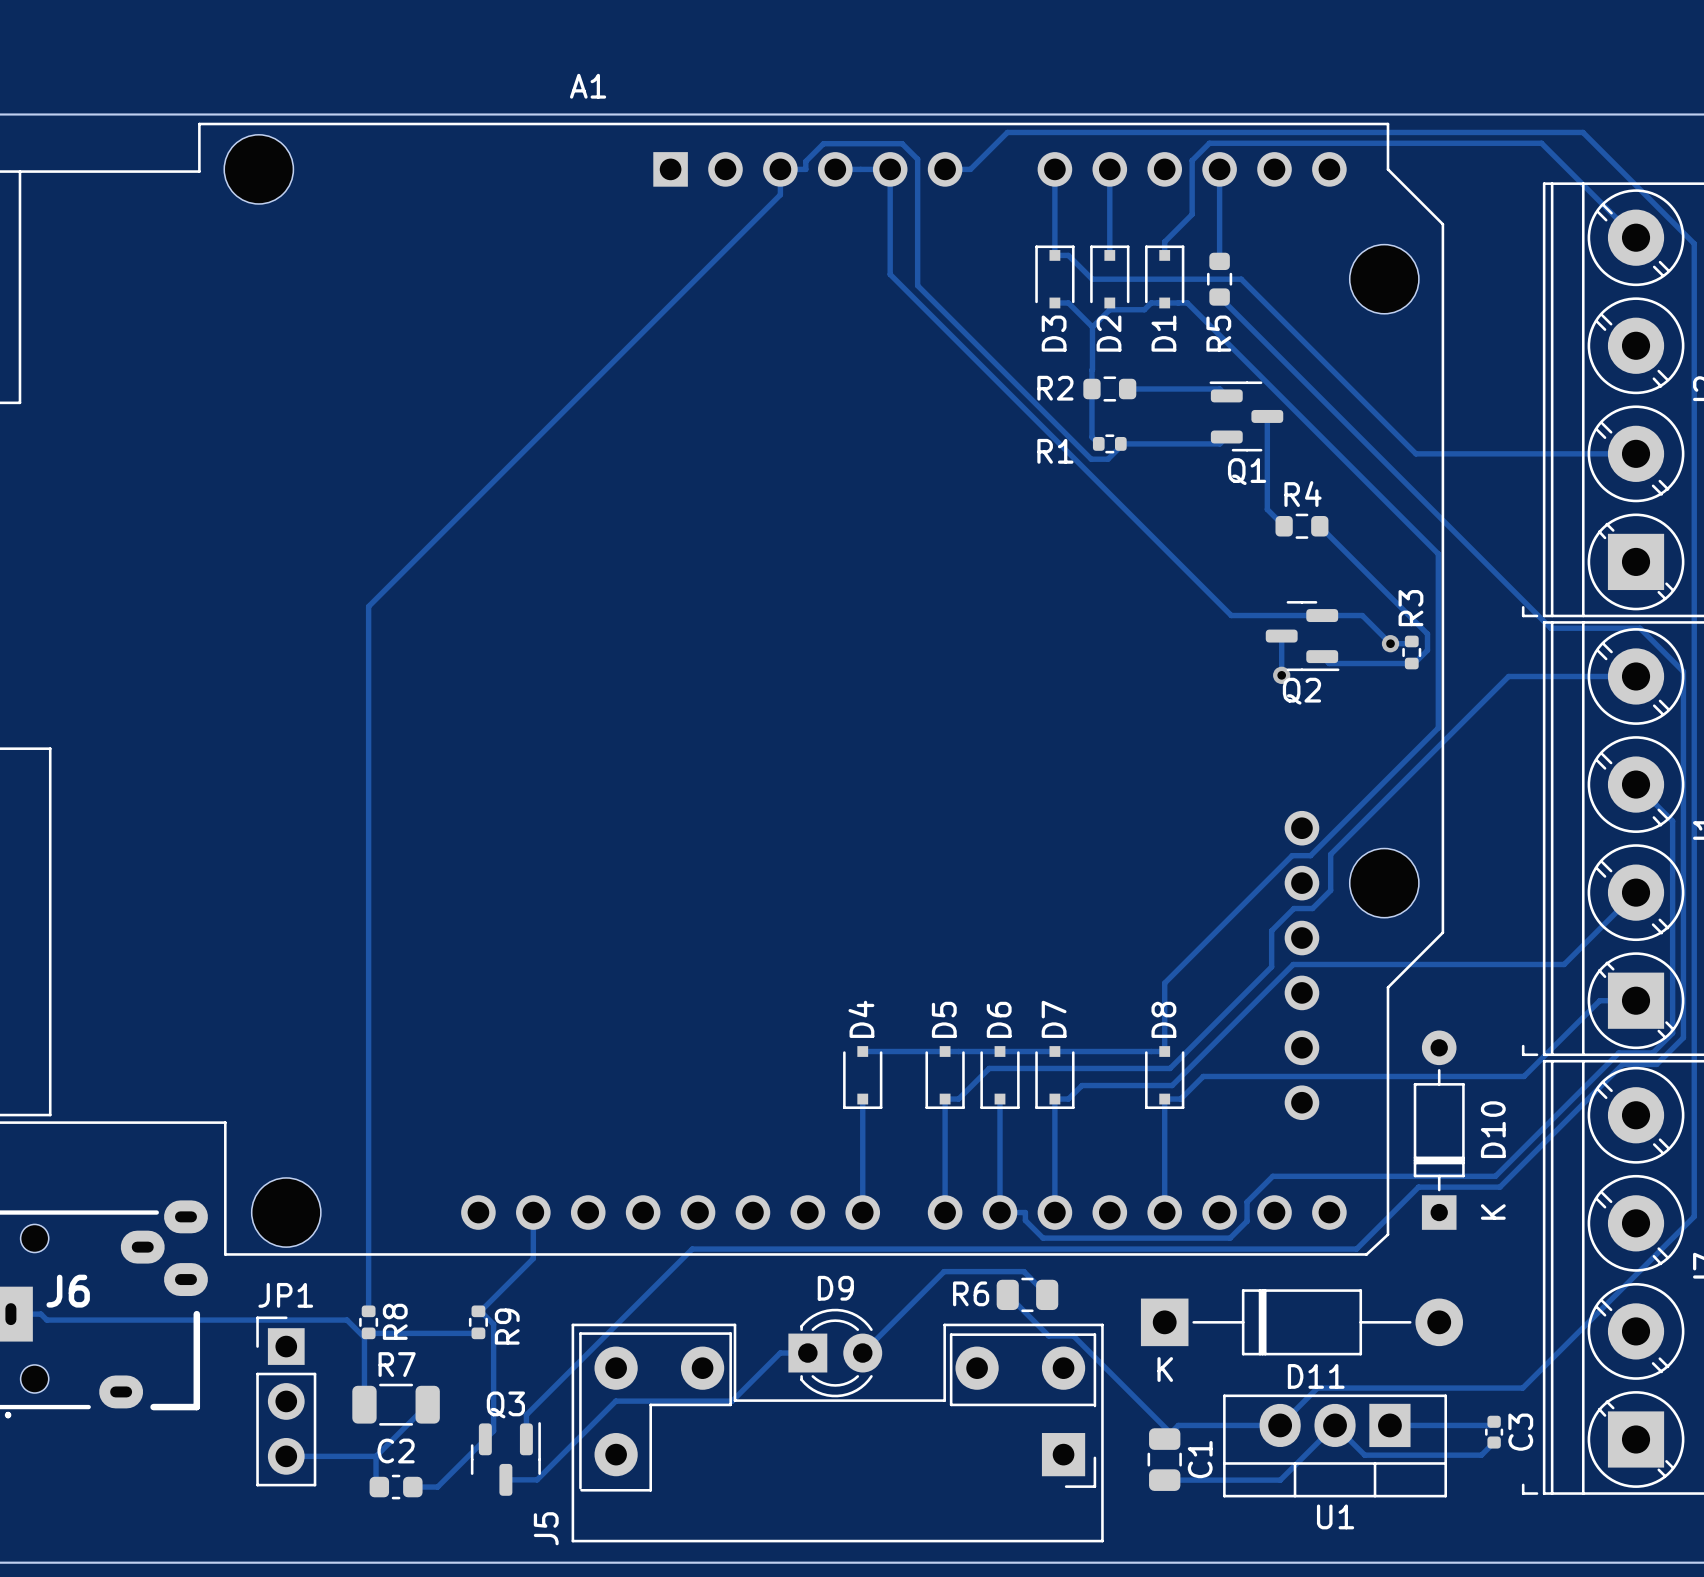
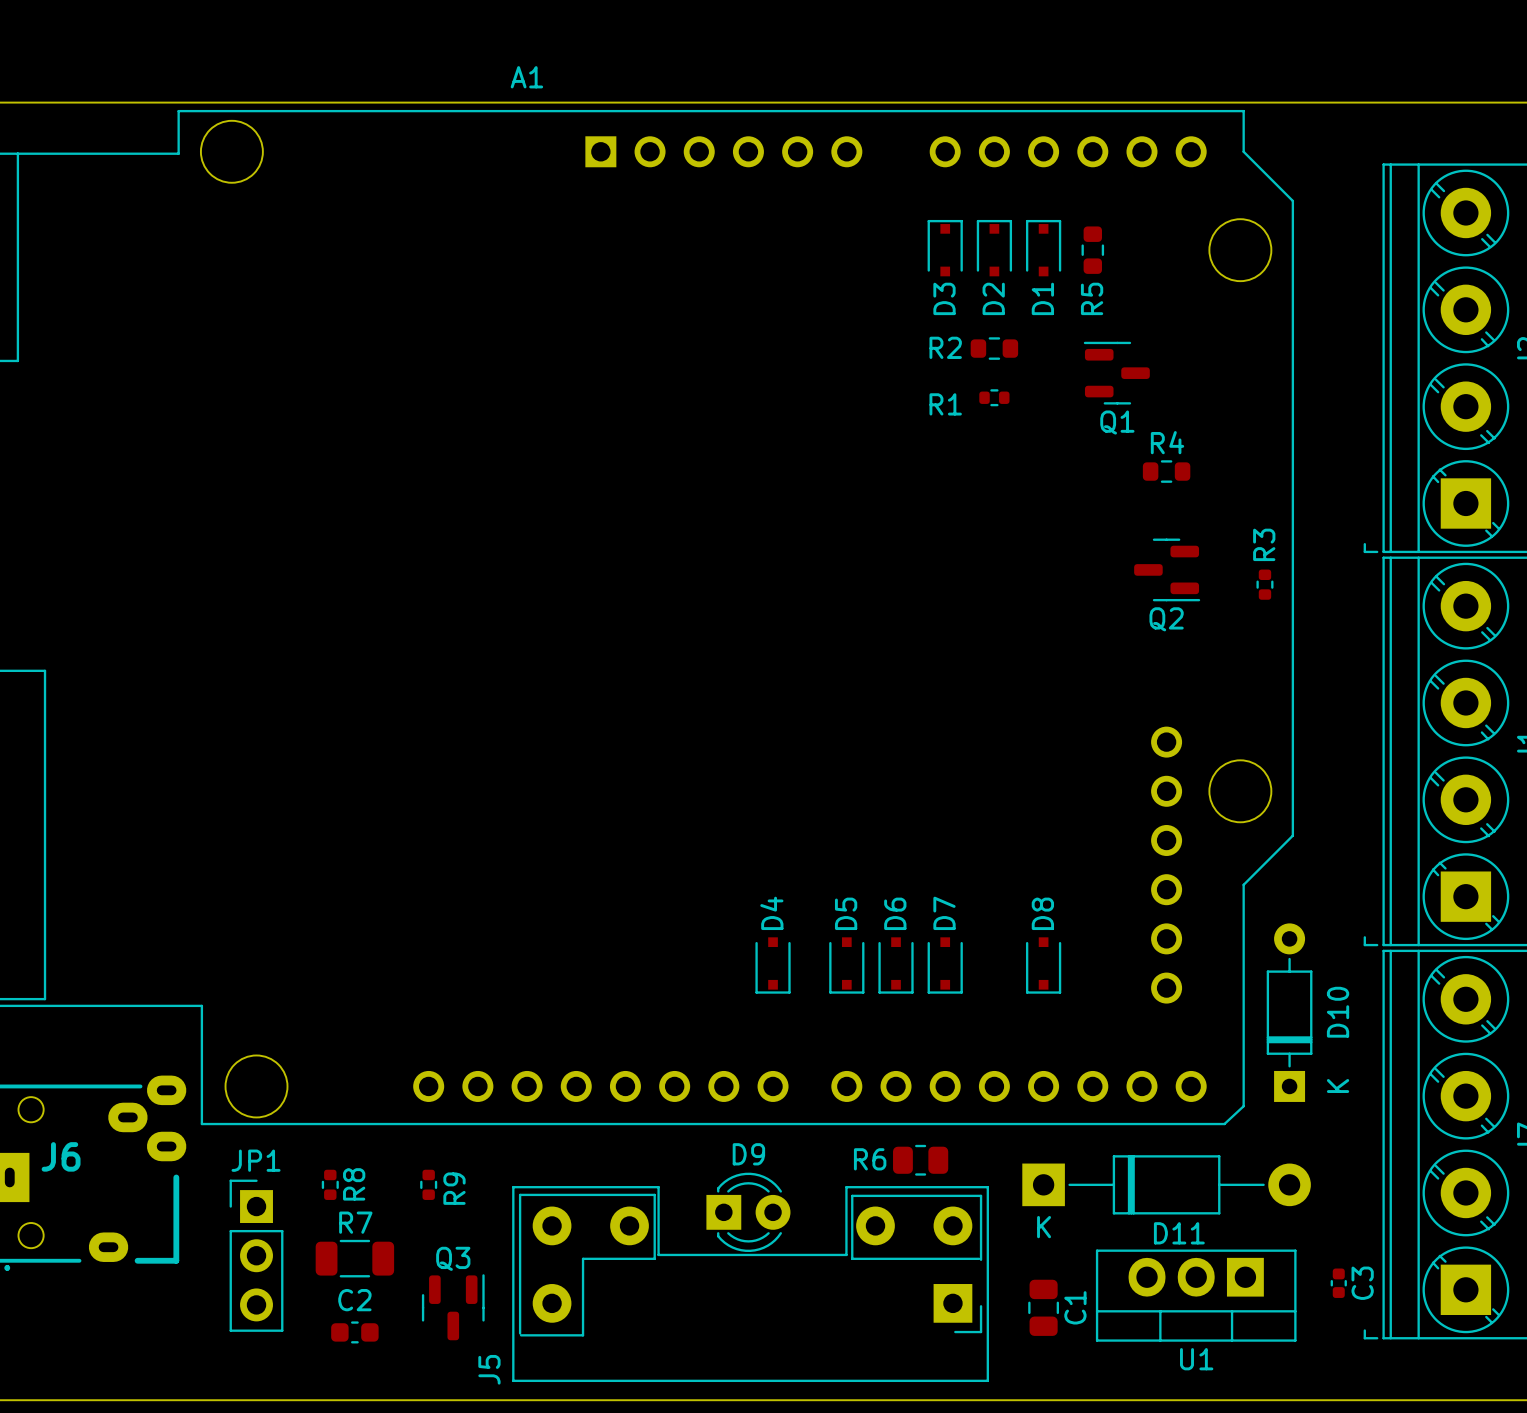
track: (835, 169) (890, 169) (890, 274) (1231, 615) (1362, 615) (1390, 643) (1409, 643) (1411, 641) -> none
track: (945, 169) (970, 169) (1007, 132) (1582, 132) (1694, 243) (1694, 1216) (1522, 1388) (1317, 1388) (1280, 1425) (1178, 1425) (1164, 1439) -> none
track: (1054, 169) (1054, 255) (1068, 255) (1092, 279) (1241, 279) (1415, 453) (1636, 453) -> none
track: (1109, 169) (1109, 255) -> none
track: (1219, 169) (1219, 261) -> none
track: (1636, 237) (1541, 143) (1209, 143) (1192, 160) (1192, 214) (1164, 241) (1164, 255) -> none
track: (1219, 297) (1550, 628) (1639, 628) (1683, 671) (1683, 1037) (1656, 1064) (1622, 1064) (1499, 1187) (1418, 1187) (1356, 1249) (692, 1249) (526, 1414) (526, 1439) -> none
track: (1054, 302) (1068, 302) (1092, 327) -> none
track: (1109, 309) (1092, 327) -> none
track: (1109, 309) (1144, 309) (1151, 302) (1187, 302) (1438, 553) (1438, 727) (1310, 855) (1292, 855) (1164, 983) (1164, 1051) (862, 1051) -> none
track: (1092, 327) (1091, 437) (1098, 443) -> none
track: (1127, 389) (1219, 389) (1226, 395) -> none
track: (1267, 416) (1267, 509) (1284, 526) -> none
track: (1226, 436) (1219, 443) (1120, 443) (1120, 446) (1107, 459) (1091, 459) (917, 285) (917, 159) (902, 143) (823, 143) (805, 161) (805, 169) (780, 169) (780, 194) (368, 606) (368, 1311) -> none
track: (1319, 526) (1427, 633) (1427, 650) (1414, 663) (1329, 663) (1322, 656) -> none
track: (1281, 636) (1281, 675) -> none
via: (1390, 643) -> none
via: (1281, 675) -> none
track: (1636, 676) (1508, 676) (1330, 854) (1330, 890) (1312, 908) (1293, 908) (1271, 930) (1271, 966) (1170, 1068) (989, 1068) (958, 1099) (945, 1099) (945, 1212) -> none
track: (1636, 784) (1672, 821) (1672, 1033) (1652, 1052) (1618, 1052) (1495, 1176) (1272, 1176) (1247, 1202) (1247, 1221) (1230, 1238) (1043, 1238) (1025, 1220) (1025, 1212) (1000, 1212) (1000, 1099) -> none
track: (1636, 892) (1564, 964) (1293, 964) (1172, 1085) (1081, 1085) (1068, 1099) (1054, 1099) (1054, 1212) -> none
track: (1636, 1000) (1599, 1000) (1524, 1076) (1203, 1076) (1180, 1099) (1164, 1099) (1164, 1212) -> none
track: (862, 1099) (862, 1212) -> none
track: (533, 1212) (533, 1258) (480, 1311) -> none
track: (1007, 1294) (1048, 1335) (1073, 1335) (1170, 1433) -> none
track: (1047, 1294) (1023, 1271) (944, 1271) (862, 1353) -> none
track: (480, 1311) (493, 1324) (493, 1431) (437, 1487) (412, 1487) -> none
track: (10, 1314) (40, 1314) (46, 1320) (347, 1320) (364, 1337) -> none
track: (478, 1333) (368, 1333) (364, 1337) -> none
track: (364, 1337) (364, 1404) -> none
track: (807, 1353) (780, 1353) (732, 1401) (615, 1401) (537, 1479) (505, 1479) -> none
track: (427, 1404) (376, 1456) -> none
track: (1494, 1421) (1490, 1425) (1389, 1425) -> none
track: (1494, 1442) (1481, 1455) (1364, 1455) (1335, 1425) (1280, 1480) (1164, 1480) -> none
track: (286, 1456) (376, 1456) -> none
track: (376, 1456) (376, 1483) (379, 1487) -> none

